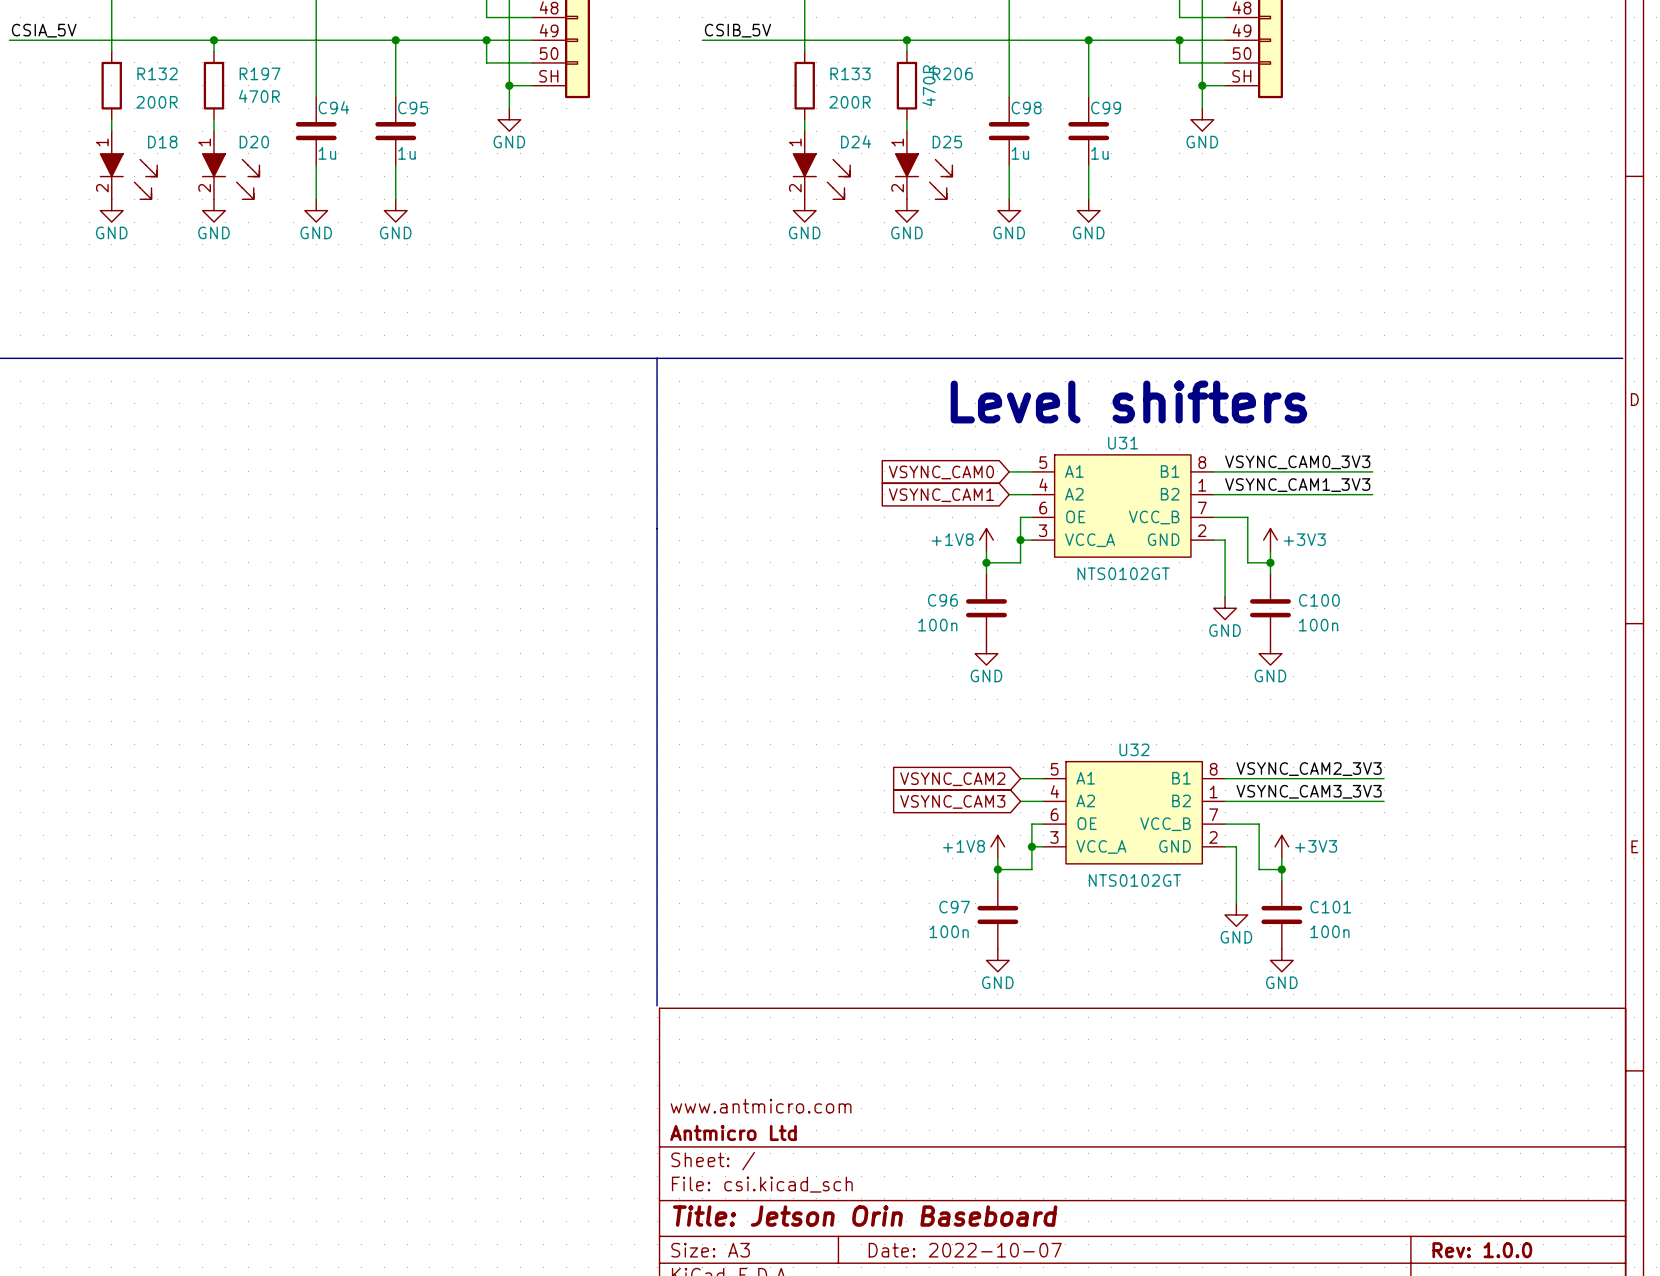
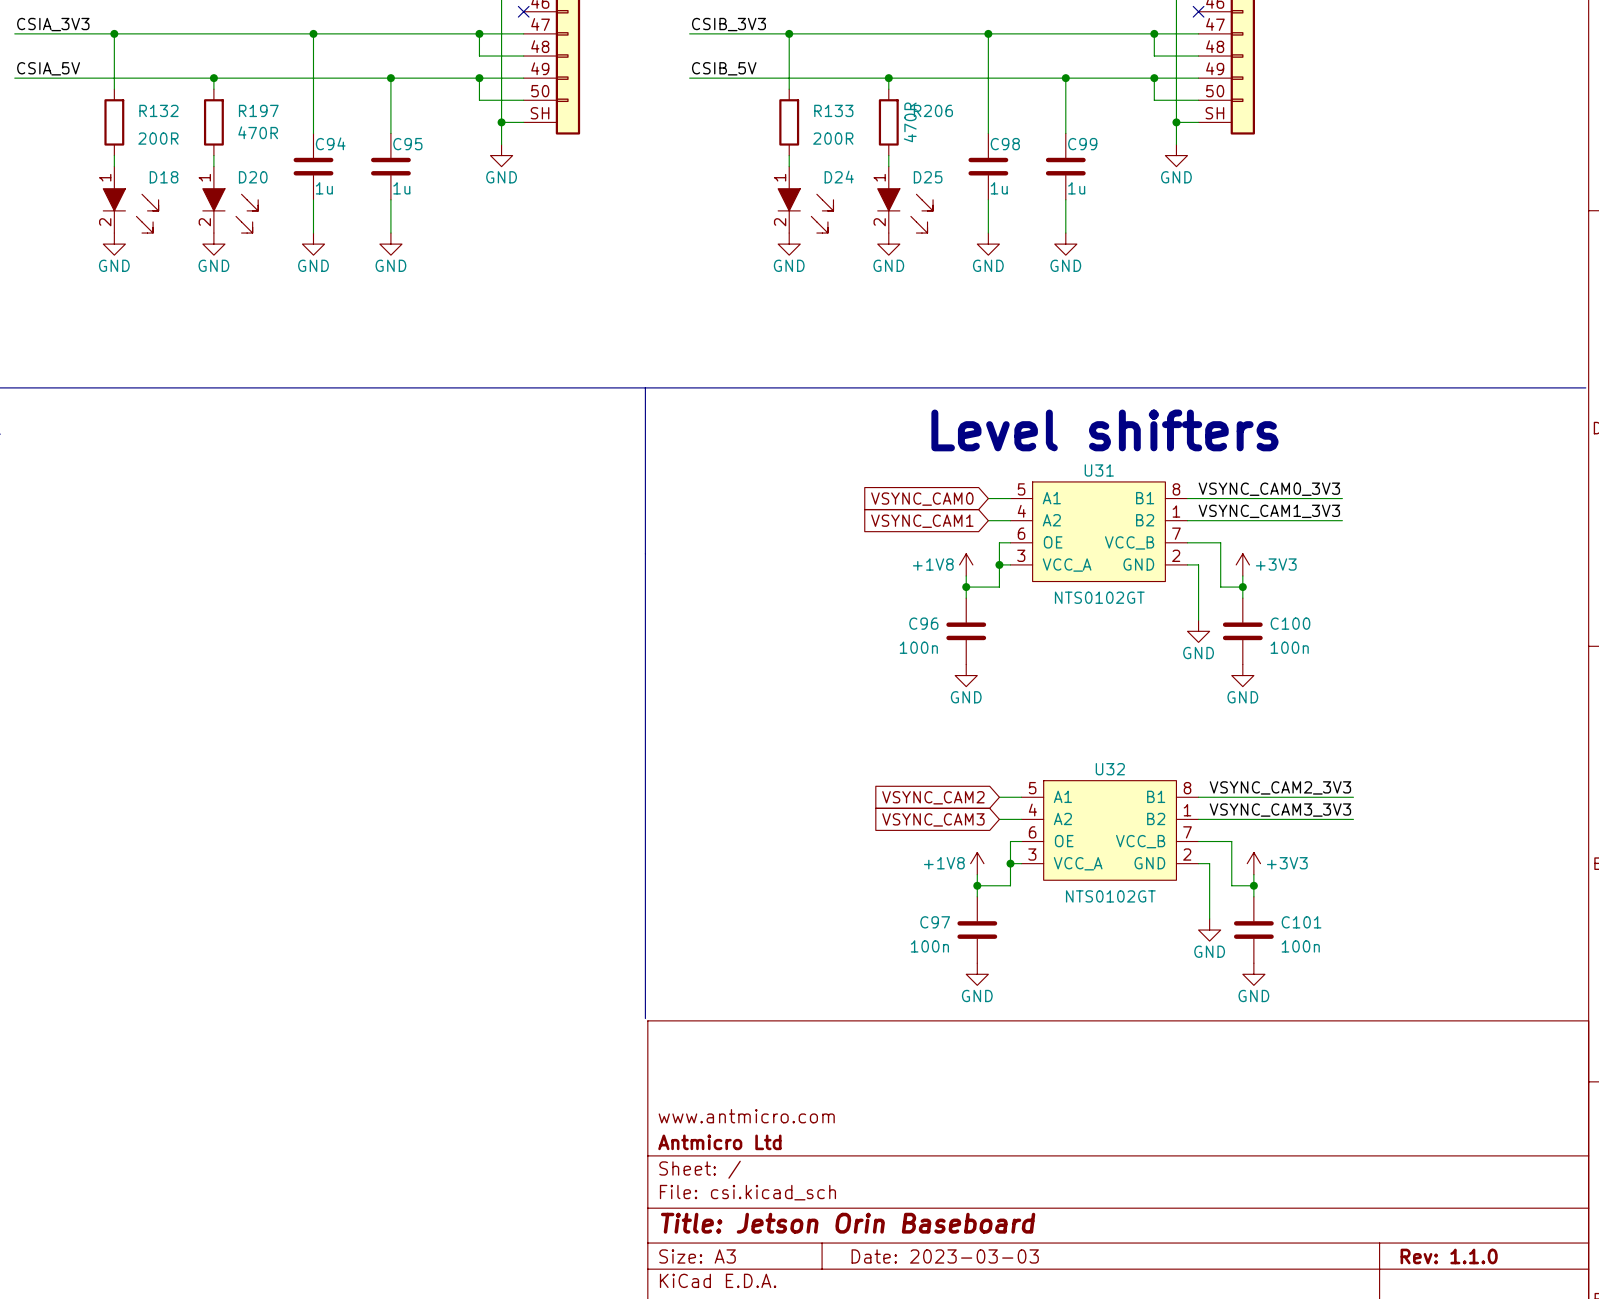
title block: Date: 2022-10-07 (965, 1250) -> Date: 2023-03-03 (945, 1256)
title block: Rev: 1.0.0 (1482, 1250) -> Rev: 1.1.0 (1449, 1256)

